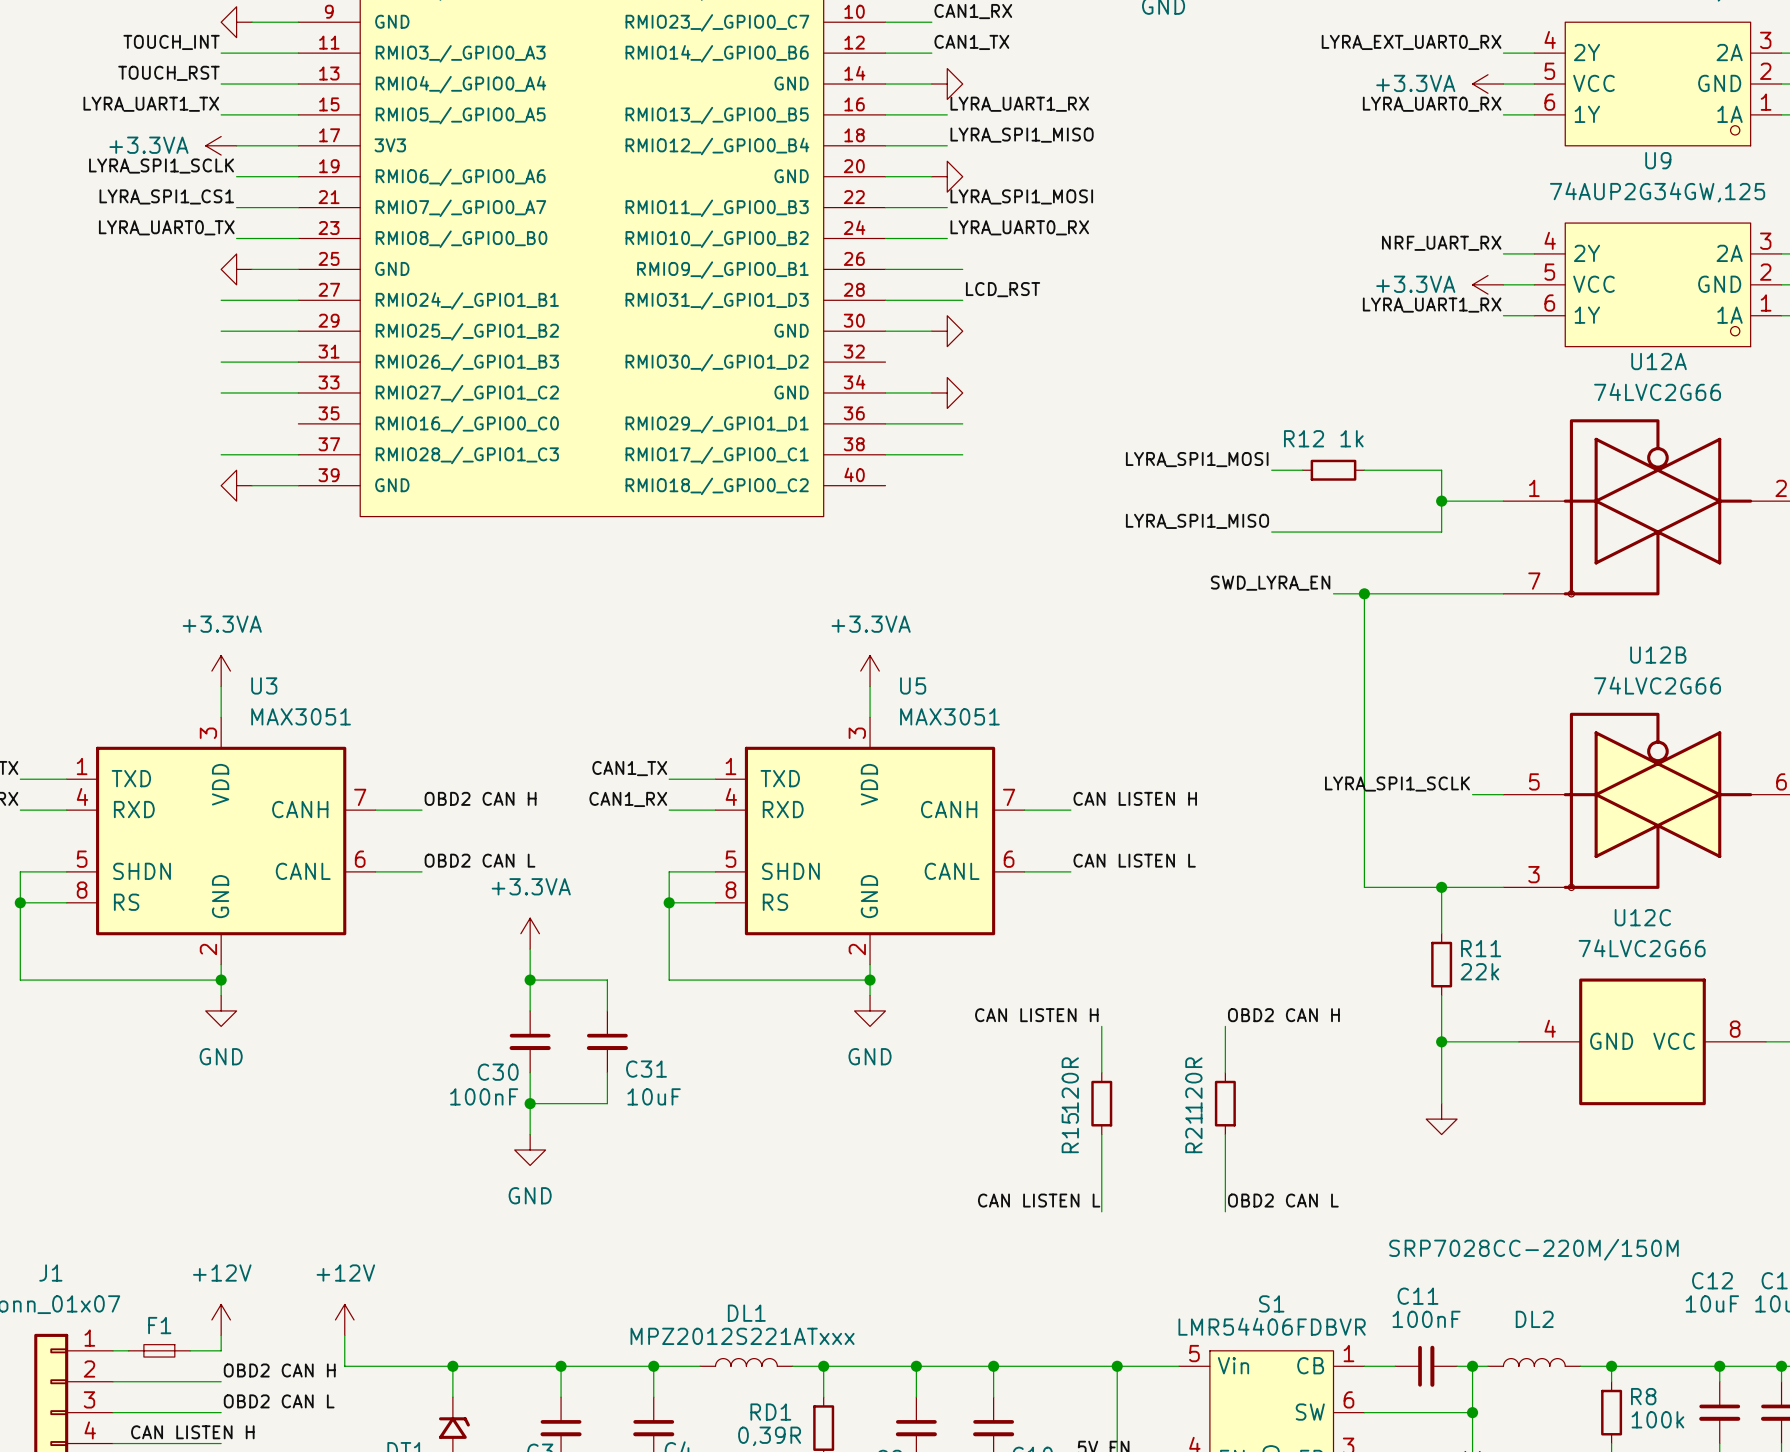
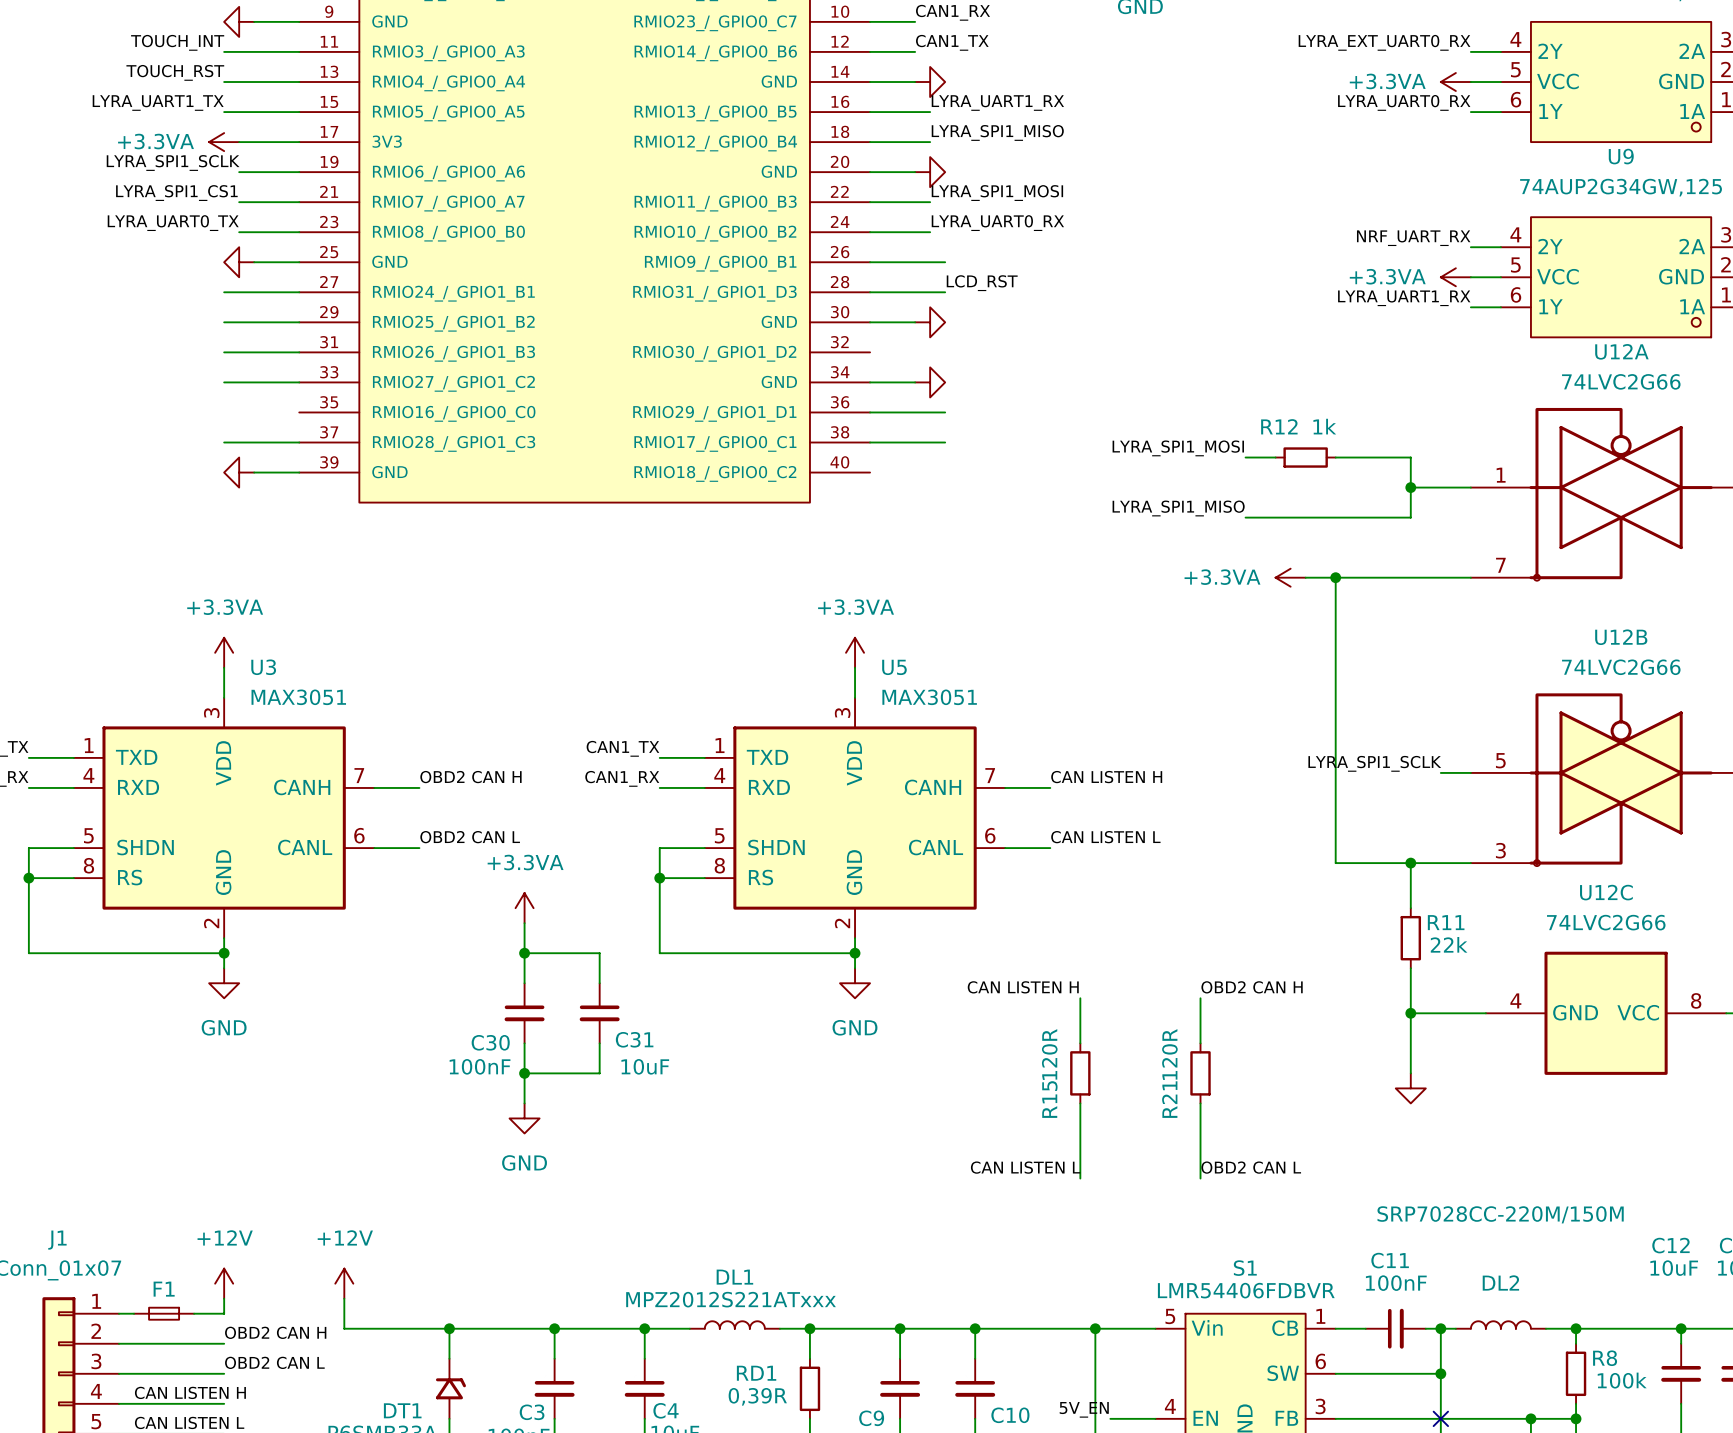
label: SWD_LYRA_EN (1270, 583) -> none
power symbol: none -> +3.3VA (1290, 577)

